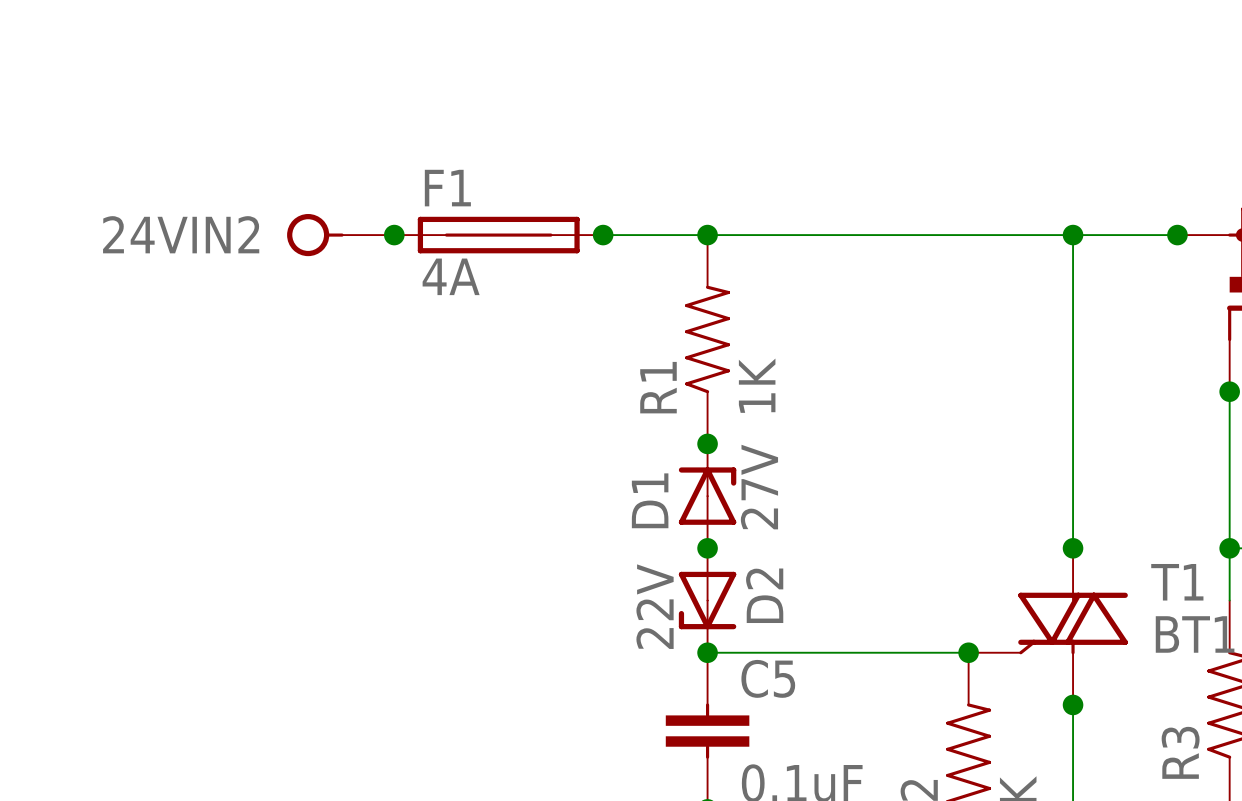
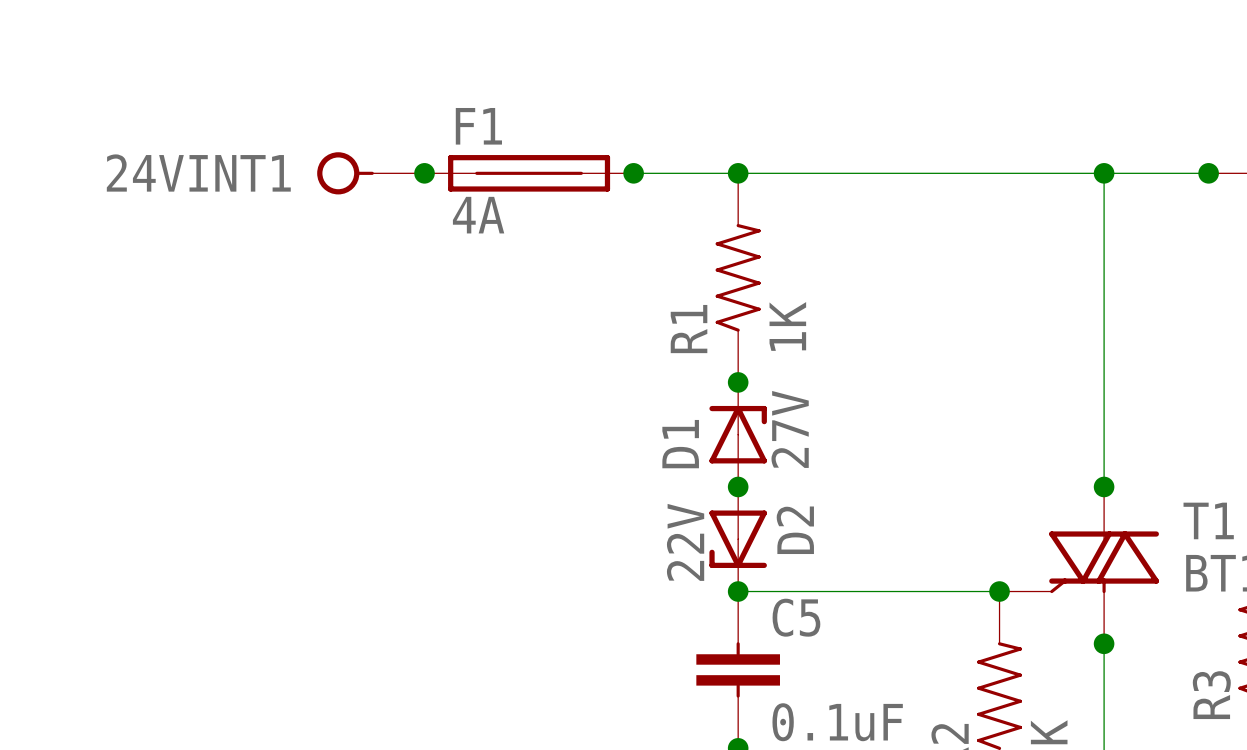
24VIN2 name: 24VIN2 (181, 234) -> 24VINT1 (198, 173)

